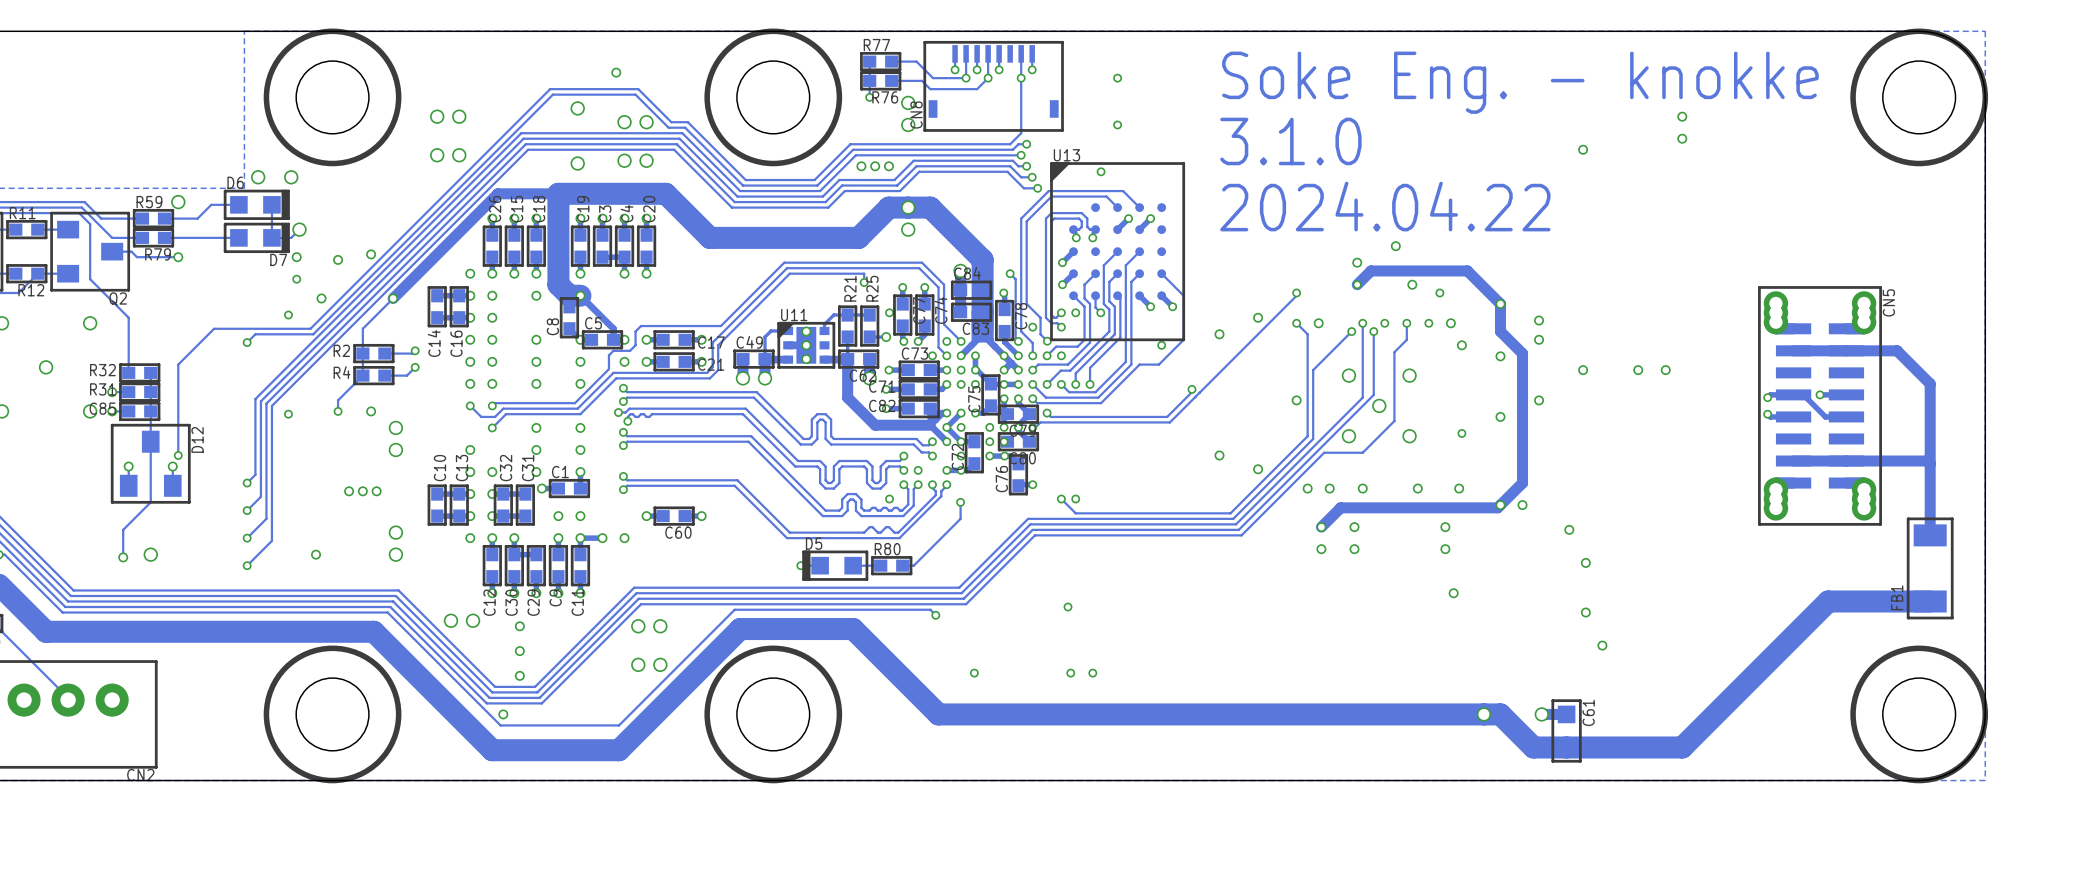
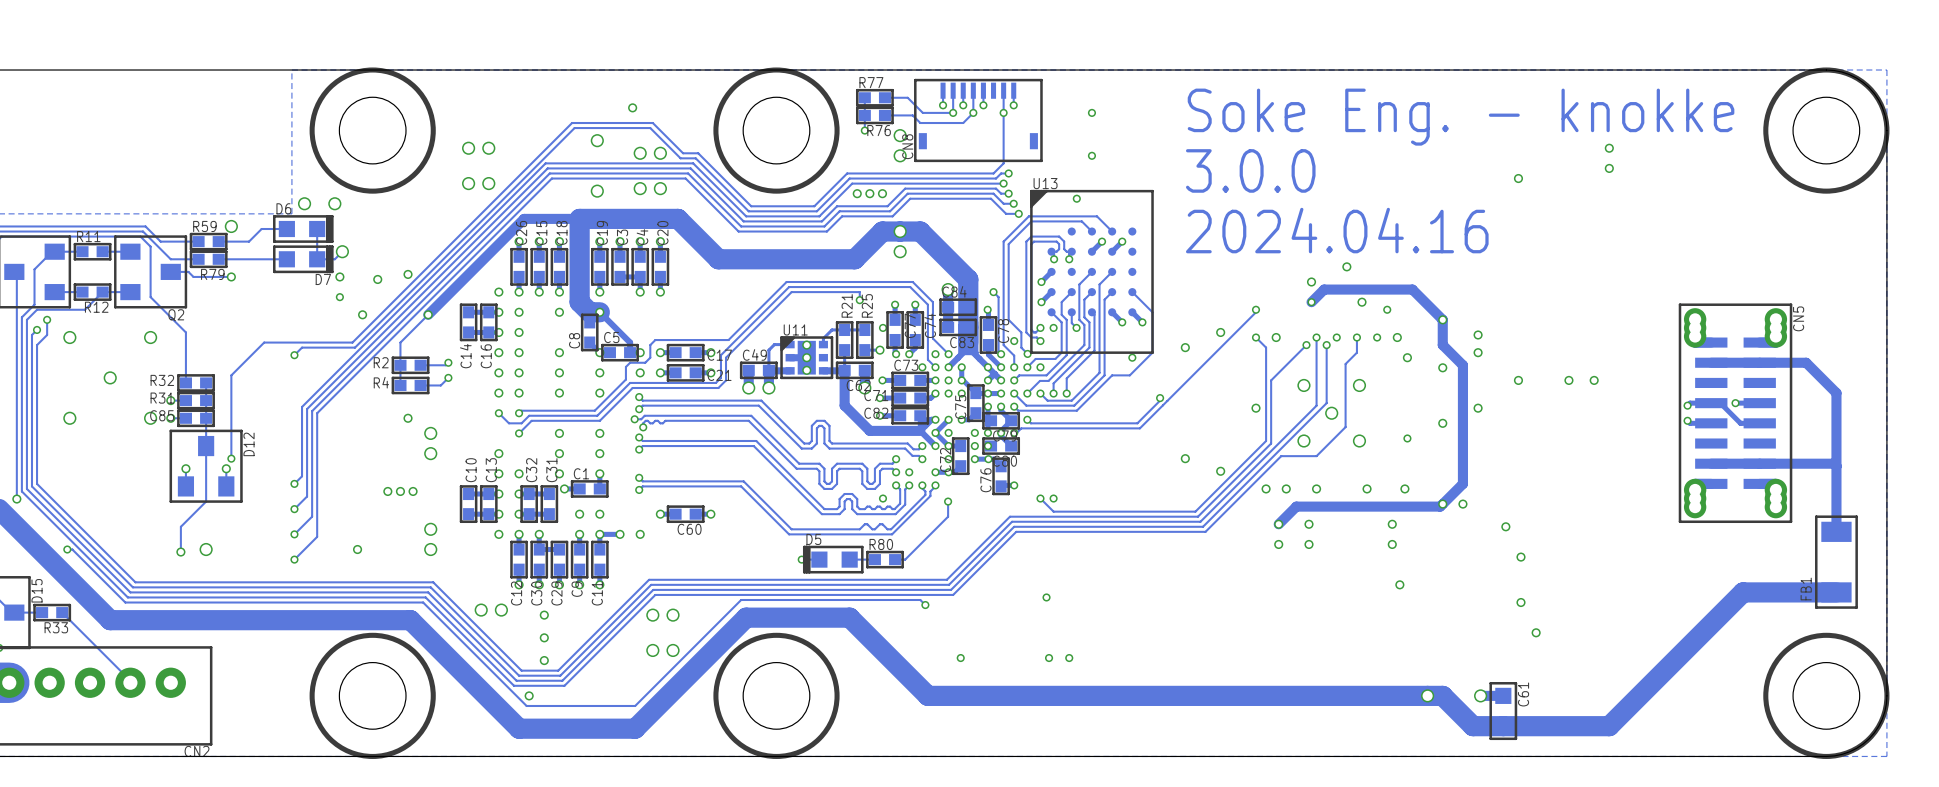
text: 3.1.0 (1290, 141) -> 3.0.0 (1250, 170)
text: 2024.04.22 (1385, 206) -> 2024.04.16 (1337, 230)
via: (288, 315) -> none
track: (362, 375) (338, 400) (338, 411) -> none
via: (338, 411) -> none
via: (288, 414) -> none

